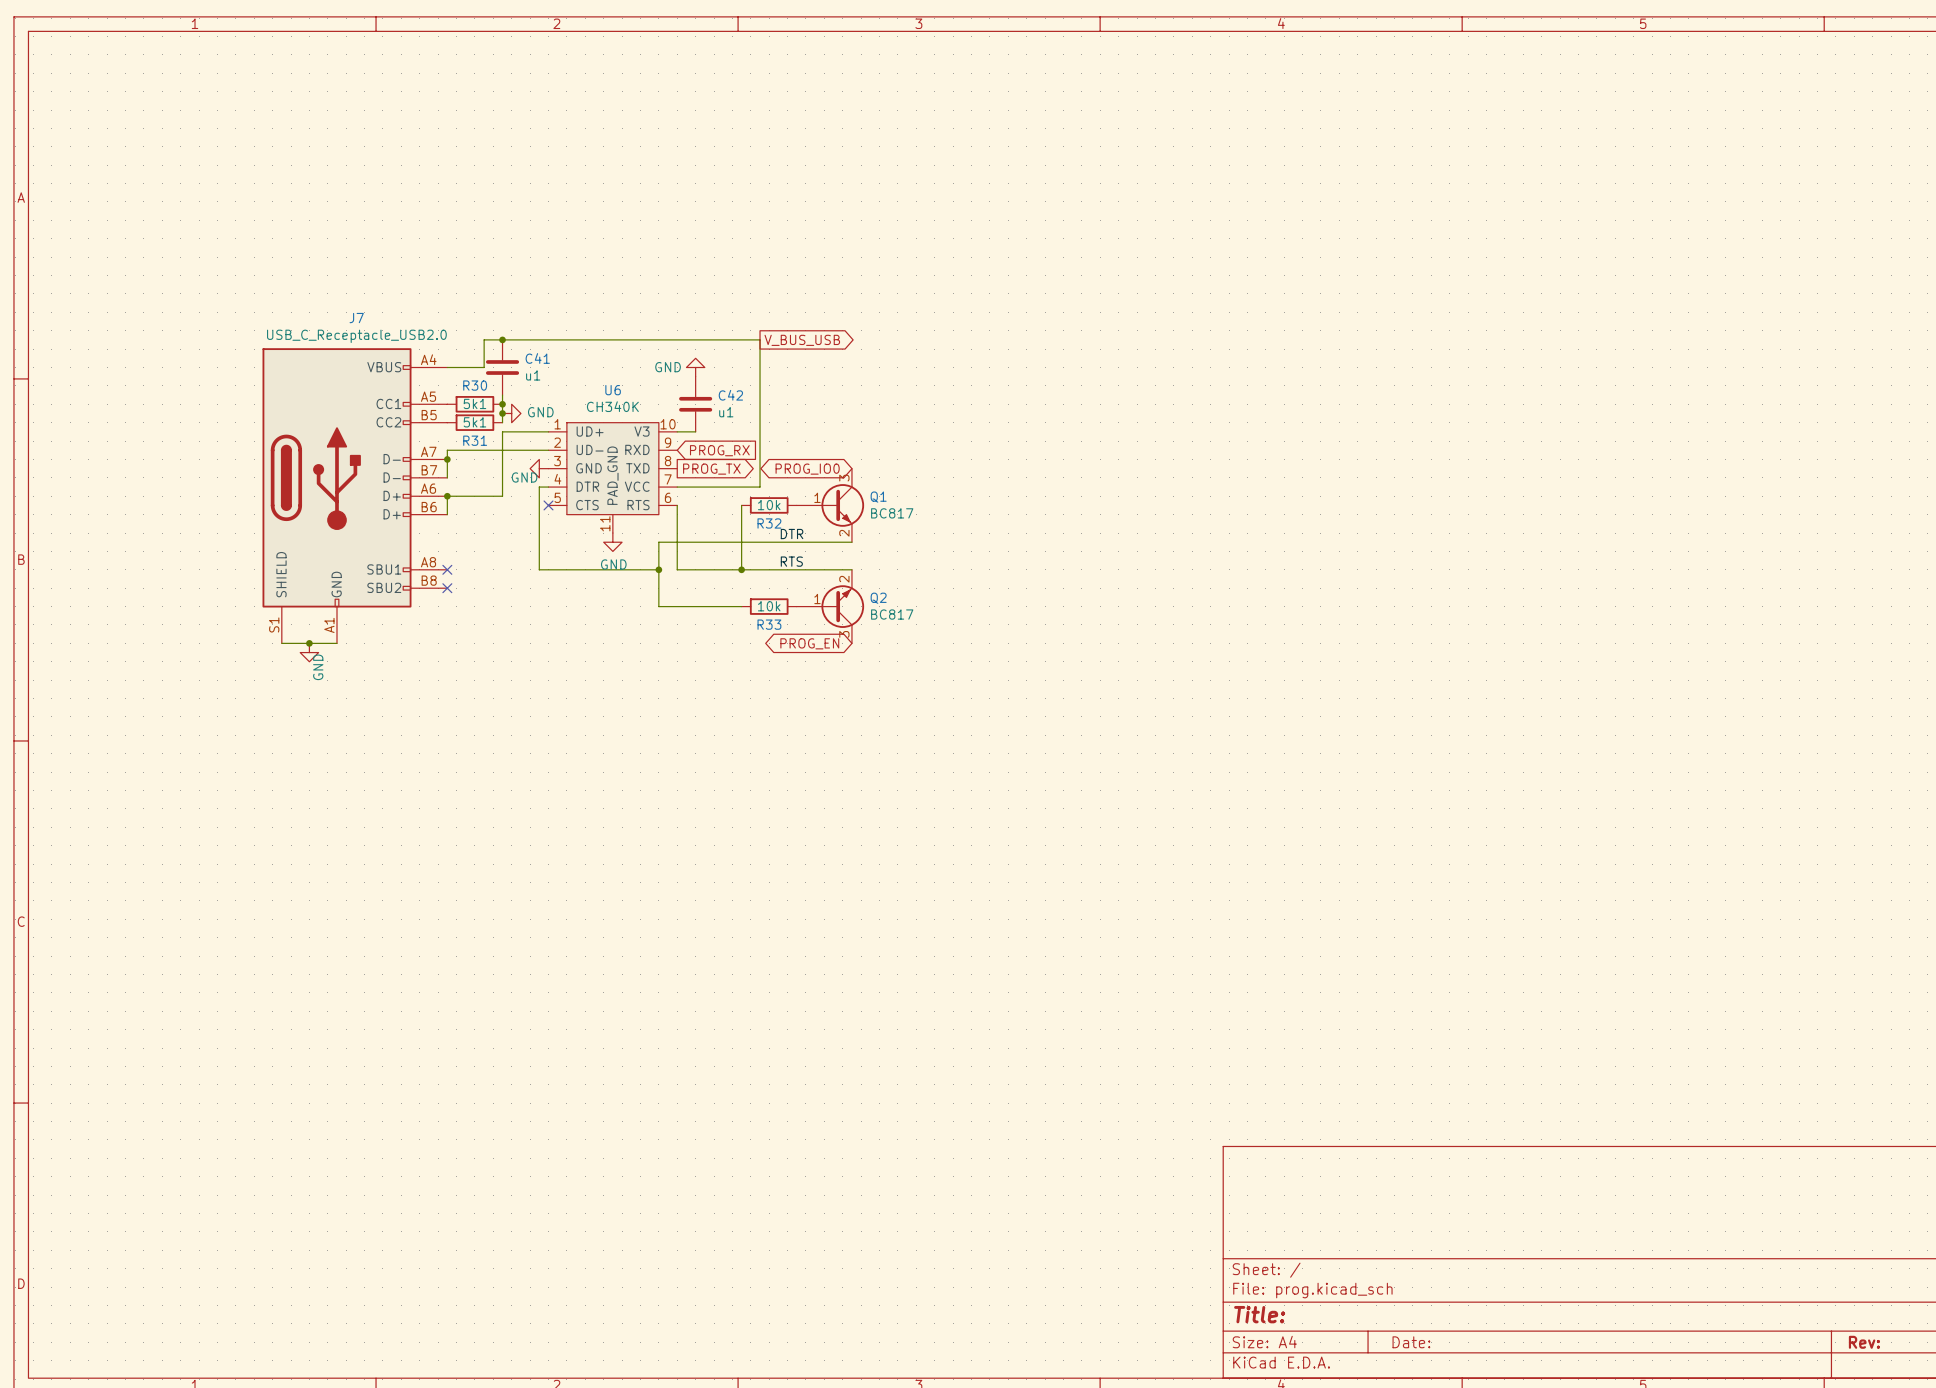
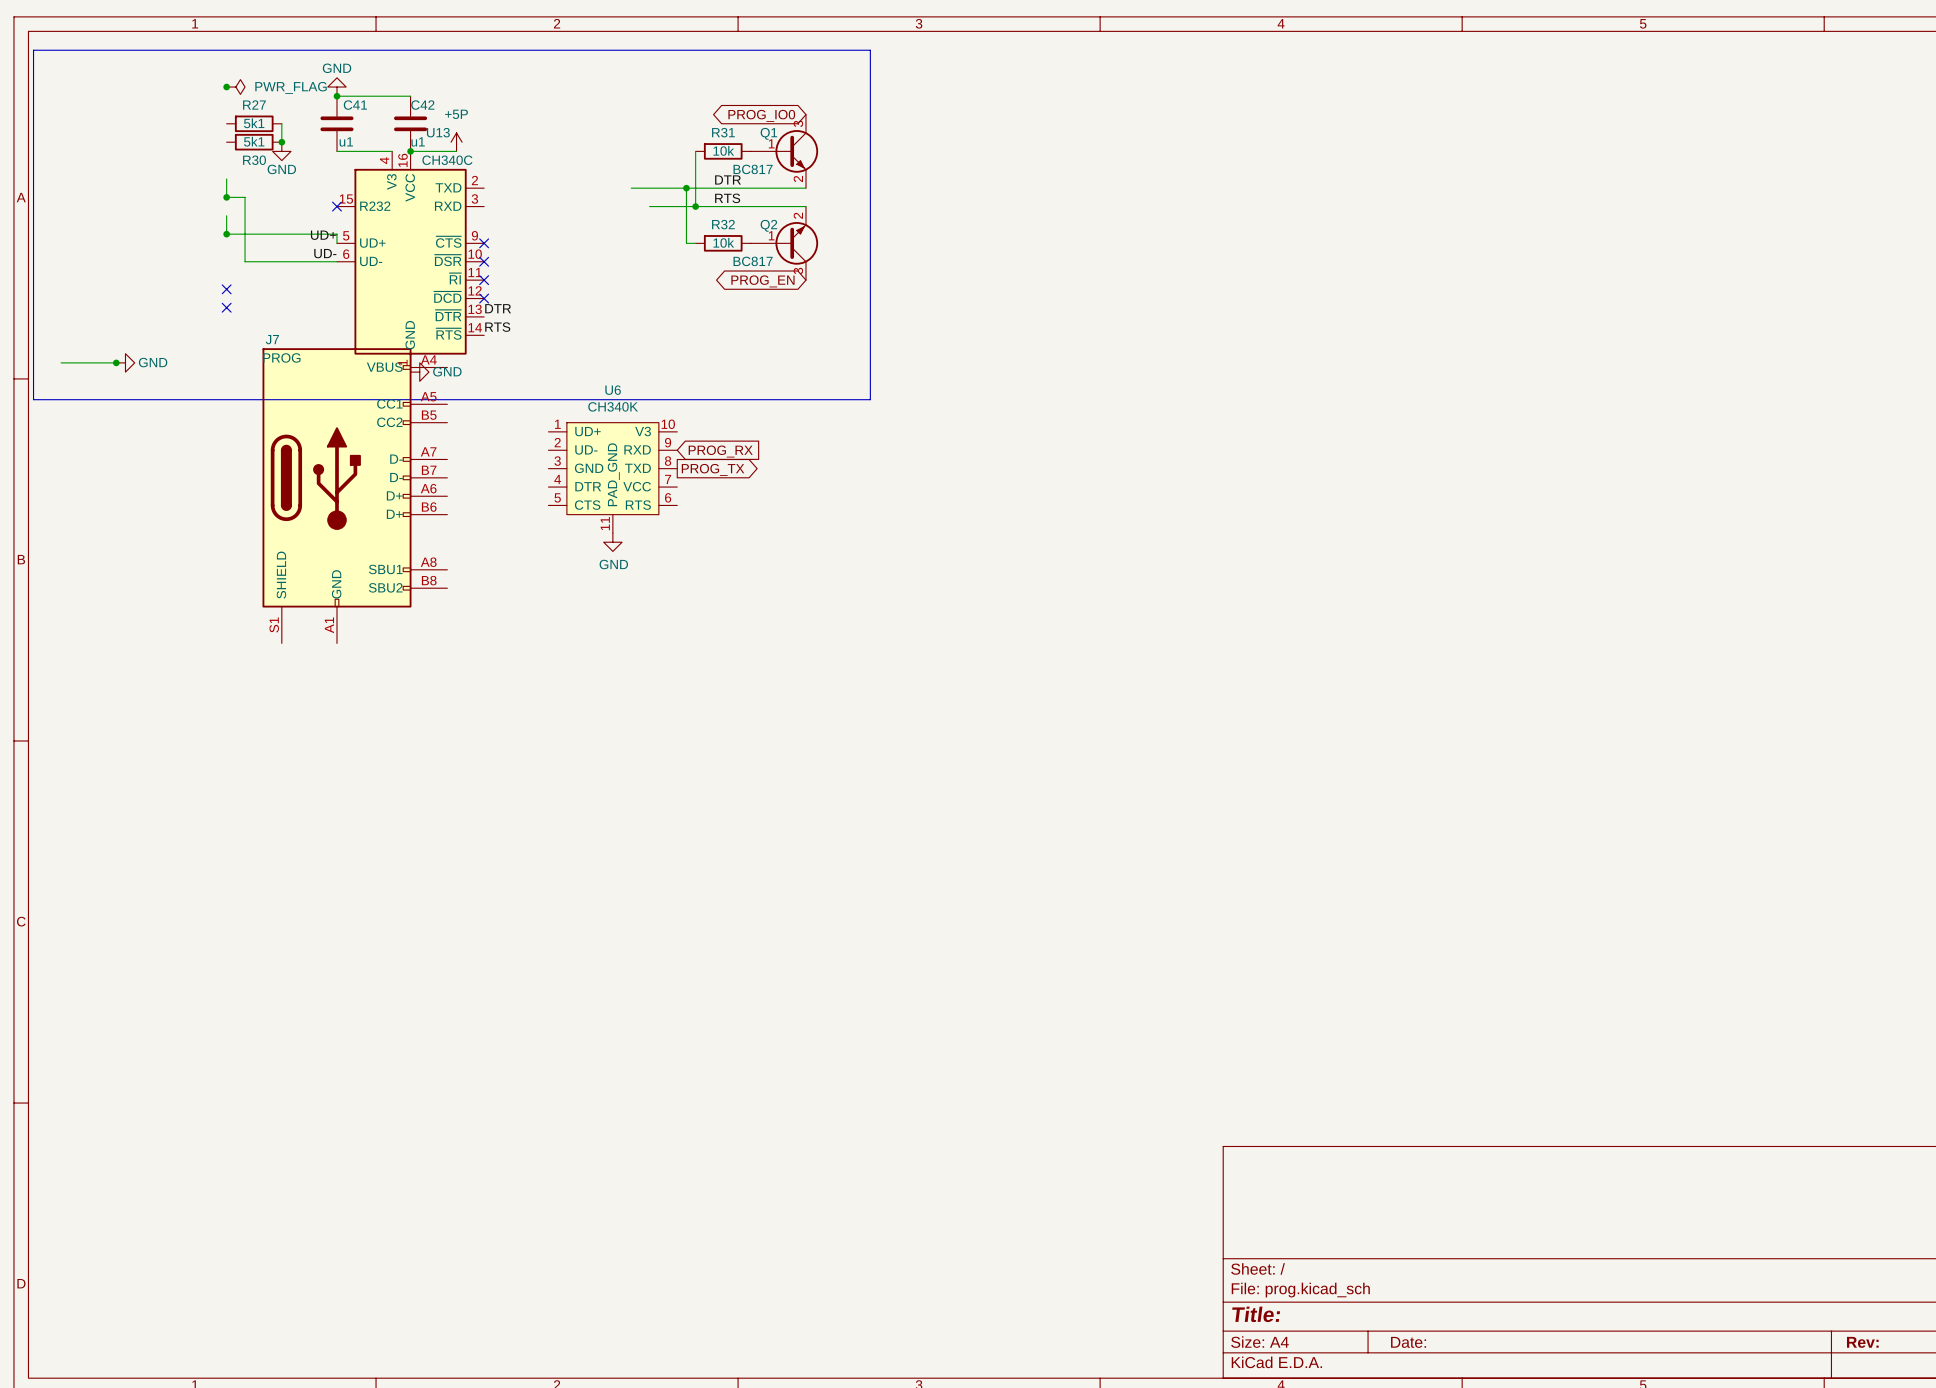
line: none -> (33, 50) (33, 399) (870, 399) (870, 50) (33, 50)
junction: none -> (226, 87)
power symbol: none -> PWR_FLAG (235, 87)
power symbol: none -> GND (337, 87)
wire: none -> (337, 96) (410, 96)
junction: none -> (337, 96)
global label: none -> PROG_IO0 (761, 115)
R27: none -> 5k1 (254, 123)
wire: none -> (281, 123) (281, 142)
junction: none -> (281, 142)
power symbol: none -> +5P (456, 142)
power symbol: none -> GND (281, 151)
wire: none -> (337, 151) (392, 151)
wire: none -> (410, 151) (456, 151)
junction: none -> (410, 151)
wire: none -> (695, 151) (695, 206)
wire: none -> (226, 178) (226, 197) (245, 197) (245, 261) (337, 261)
label: none -> DTR (728, 179)
wire: none -> (631, 188) (805, 188)
wire: none -> (686, 188) (686, 243) (695, 243)
junction: none -> (686, 188)
junction: none -> (226, 197)
label: none -> RTS (727, 198)
no-connect mark: none -> (337, 206)
wire: none -> (649, 206) (805, 206)
junction: none -> (695, 206)
wire: none -> (226, 215) (226, 234) (337, 234) (337, 243)
junction: none -> (226, 234)
label: none -> UD+ (323, 235)
no-connect mark: none -> (484, 243)
label: none -> UD- (325, 253)
U13: none -> CH340C (410, 261)
no-connect mark: none -> (484, 261)
no-connect mark: none -> (484, 280)
global label: none -> PROG_EN (762, 281)
no-connect mark: none -> (226, 289)
no-connect mark: none -> (484, 298)
no-connect mark: none -> (226, 307)
label: none -> DTR (498, 308)
J7 name position: J7 (356, 318) -> J7 (272, 339)
label: none -> RTS (497, 327)
J7 value: USB_C_Receptacle_USB2.0 (356, 336) -> PROG (281, 357)
junction: (502, 339) -> none
global label: V_BUS_USB (802, 340) -> none
C41 name position: C41 (537, 358) -> C41 (355, 105)
wire: none -> (61, 362) (116, 362)
junction: none -> (116, 362)
power symbol: none -> GND (125, 362)
wire: (447, 367) (484, 367) (484, 339) (760, 339) (760, 487) (677, 487) -> none
C41 position: (502, 367) -> (337, 123)
power symbol: GND (695, 367) -> none
power symbol: none -> GND (419, 372)
C41 value position: u1 (533, 375) -> u1 (346, 141)
R30 name position: R30 (475, 385) -> R30 (254, 160)
wire: (502, 395) (502, 422) -> none
C42 name position: C42 (730, 395) -> C42 (422, 105)
R30 position: (474, 404) -> (254, 142)
junction: (502, 404) -> none
C42 position: (695, 404) -> (410, 123)
C42 value position: u1 (726, 412) -> u1 (418, 141)
junction: (502, 413) -> none
power symbol: GND (511, 413) -> none
R31 position: (474, 422) -> (723, 151)
R31 value: 5k1 (474, 422) -> 10k (723, 150)
wire: (548, 431) (502, 431) (502, 496) (447, 496) (447, 514) -> none
wire: (677, 431) (695, 431) -> none
R31 name position: R31 (475, 440) -> R31 (723, 132)
wire: (548, 450) (447, 450) (447, 477) -> none
junction: (447, 459) -> none
power symbol: GND (539, 468) -> none
global label: PROG_IO0 (807, 469) -> none
wire: (548, 487) (539, 487) (539, 569) (658, 569) -> none
junction: (447, 496) -> none
Q1 name position: Q1 (878, 497) -> Q1 (768, 133)
no-connect mark: (548, 505) -> none
wire: (677, 505) (677, 569) (851, 569) -> none
wire: (741, 505) (741, 569) -> none
R32 position: (769, 505) -> (723, 243)
Q1 position: (830, 505) -> (784, 151)
Q1 value position: BC817 (892, 513) -> BC817 (753, 169)
R32 name position: R32 (769, 523) -> R32 (723, 224)
label: DTR (792, 534) -> none
wire: (851, 542) (658, 542) (658, 606) (741, 606) -> none
label: RTS (791, 561) -> none
no-connect mark: (447, 569) -> none
junction: (658, 569) -> none
junction: (741, 569) -> none
no-connect mark: (447, 588) -> none
Q2 name position: Q2 (878, 598) -> Q2 (768, 225)
R33: 10k (769, 606) -> none
Q2 position: (830, 606) -> (784, 243)
Q2 value position: BC817 (892, 614) -> BC817 (753, 261)
wire: (281, 643) (337, 643) -> none
junction: (309, 643) -> none
global label: PROG_EN (809, 643) -> none
power symbol: GND (309, 652) -> none

